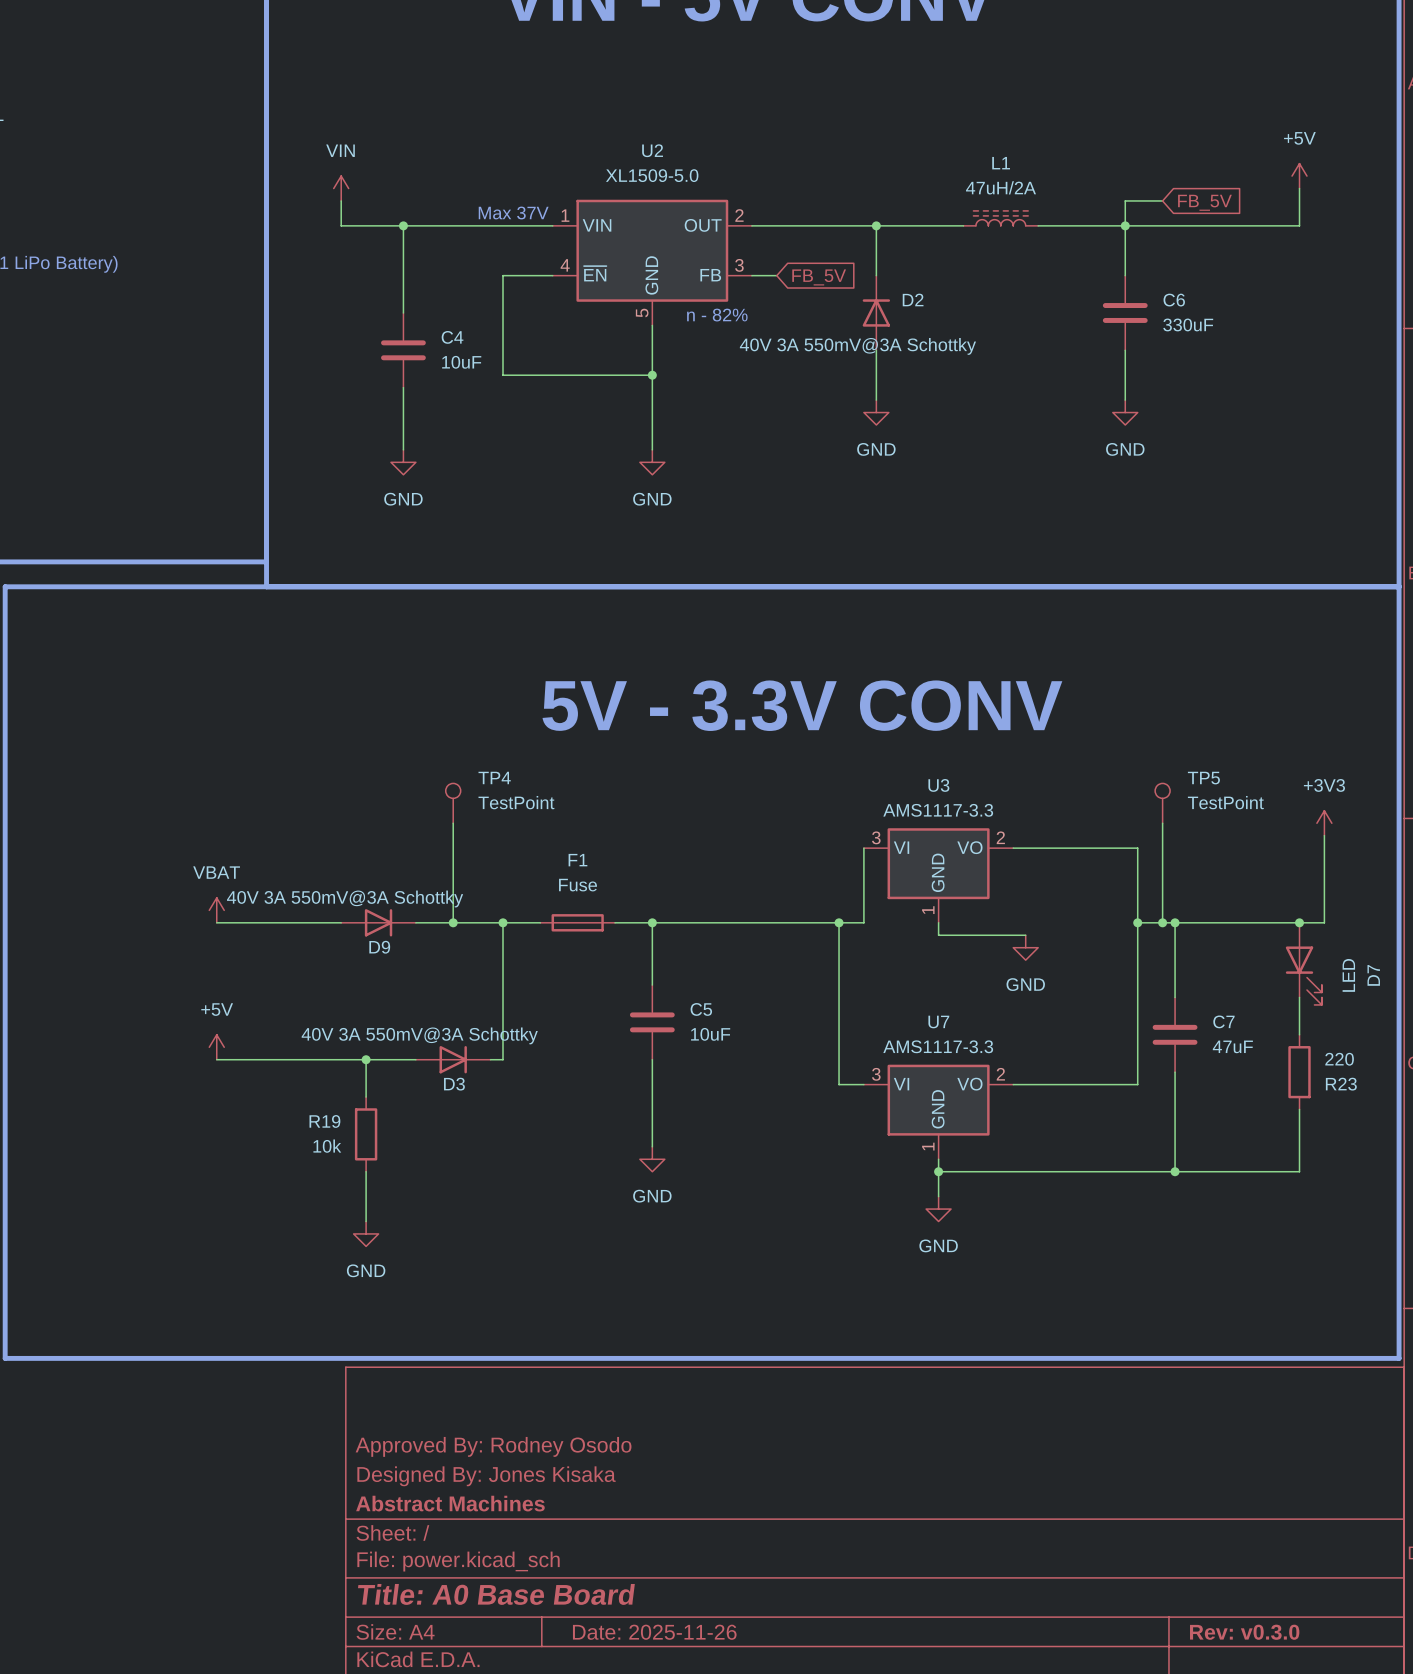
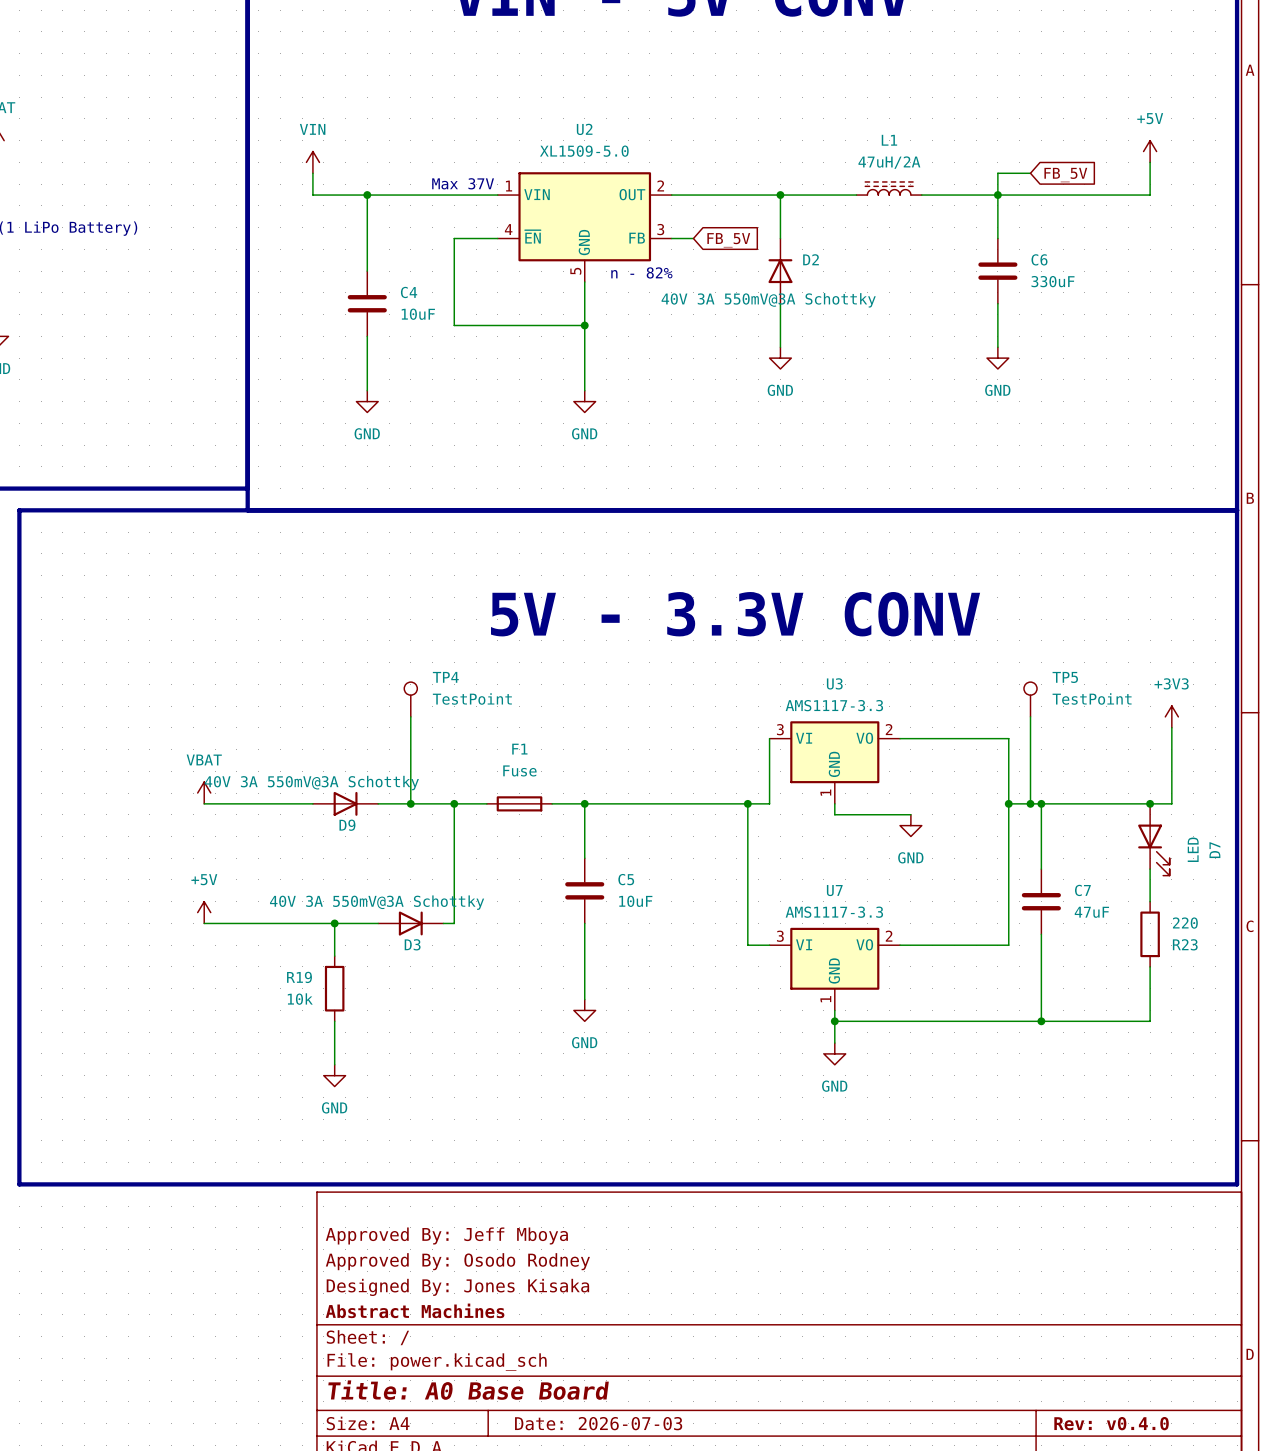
title block: none -> Approved By: Jeff Mboya (446, 1235)
title block: Approved By: Rodney Osodo (493, 1446) -> Approved By: Osodo Rodney (457, 1261)
title block: Date: 2025-11-26 (654, 1632) -> Date: 2026-07-03 (598, 1423)
title block: Rev: v0.3.0 (1244, 1632) -> Rev: v0.4.0 (1111, 1423)

